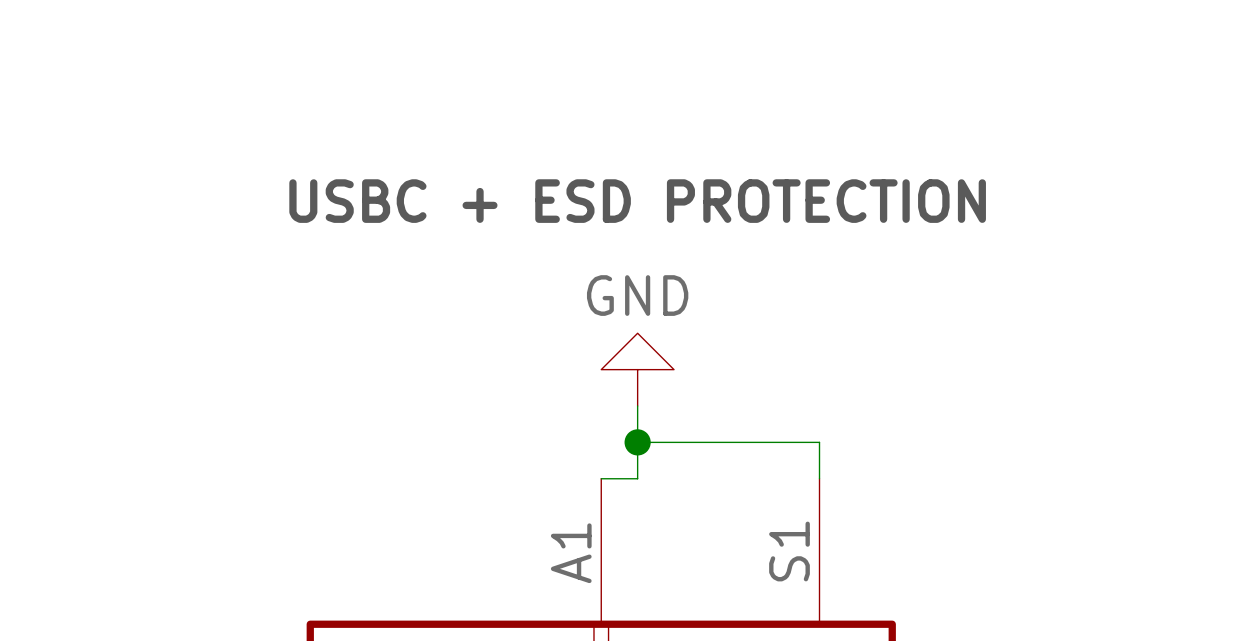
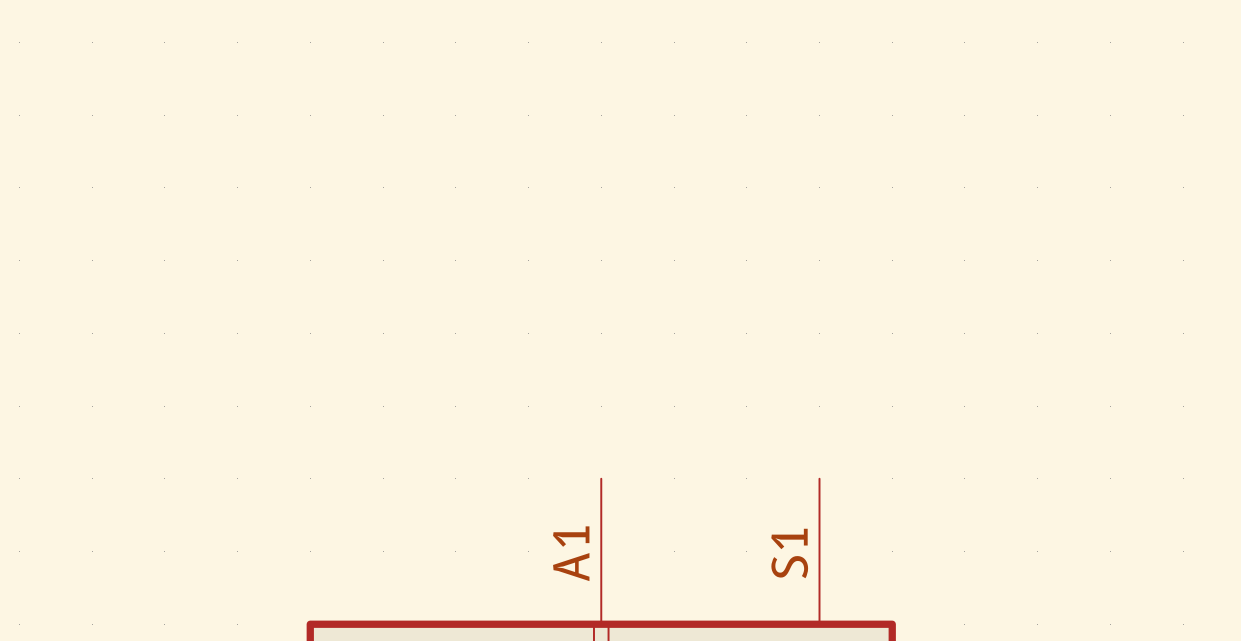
text: USBC + ESD PROTECTION (637, 201) -> none
power symbol: GND (637, 369) -> none
wire: (637, 406) (637, 478) (601, 478) -> none
wire: (637, 442) (819, 442) (819, 478) -> none
junction: (637, 442) -> none

